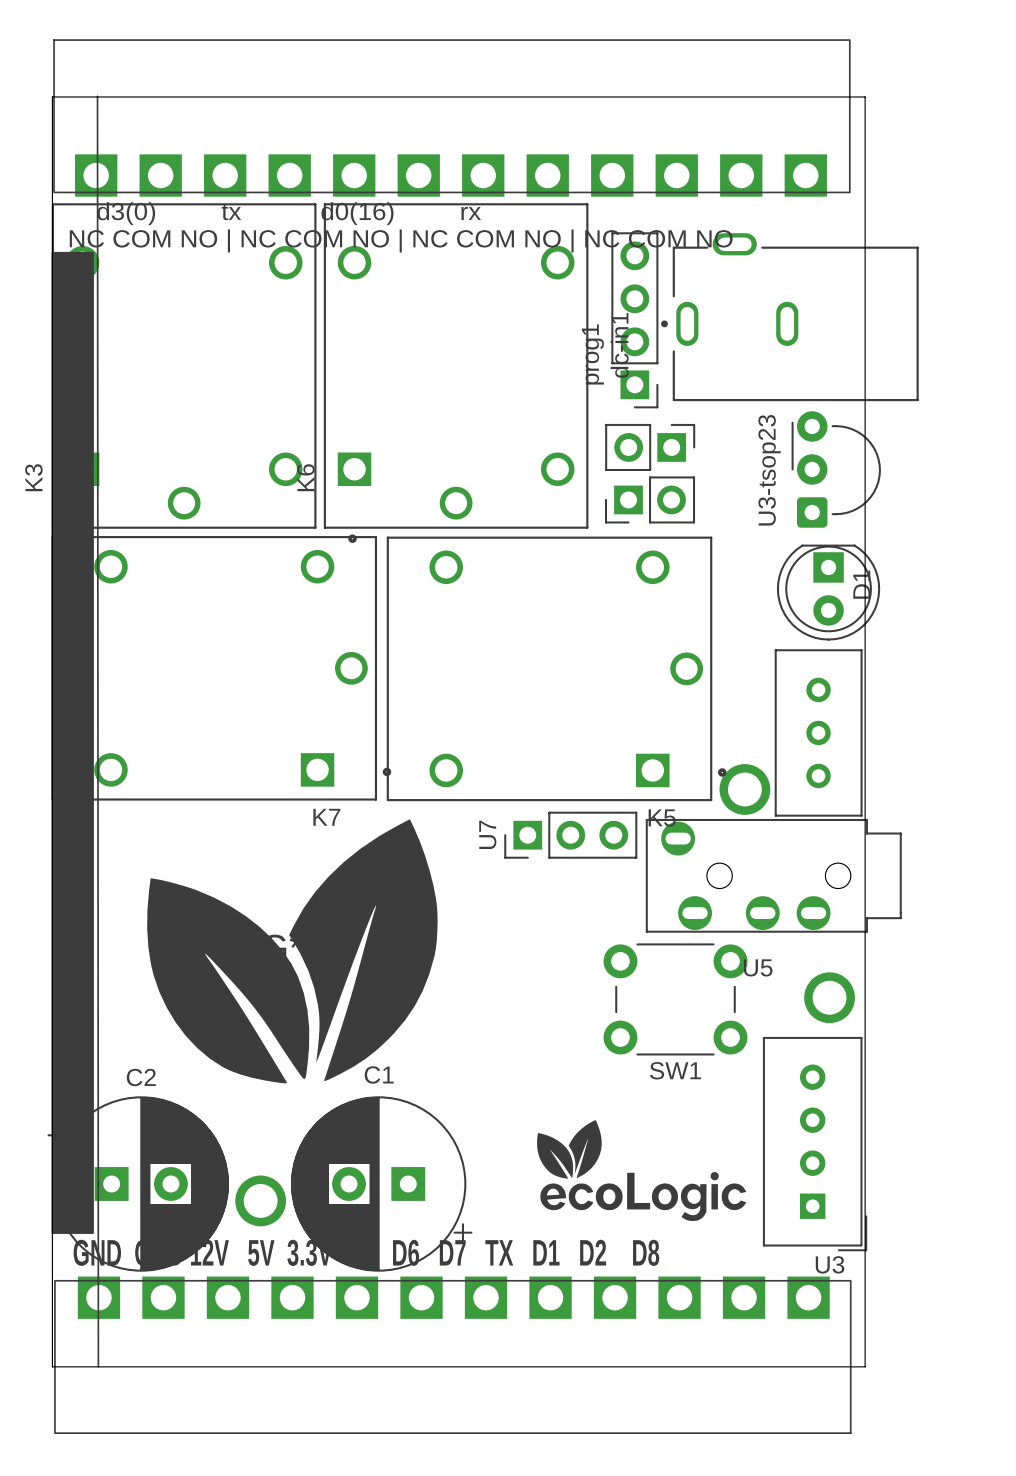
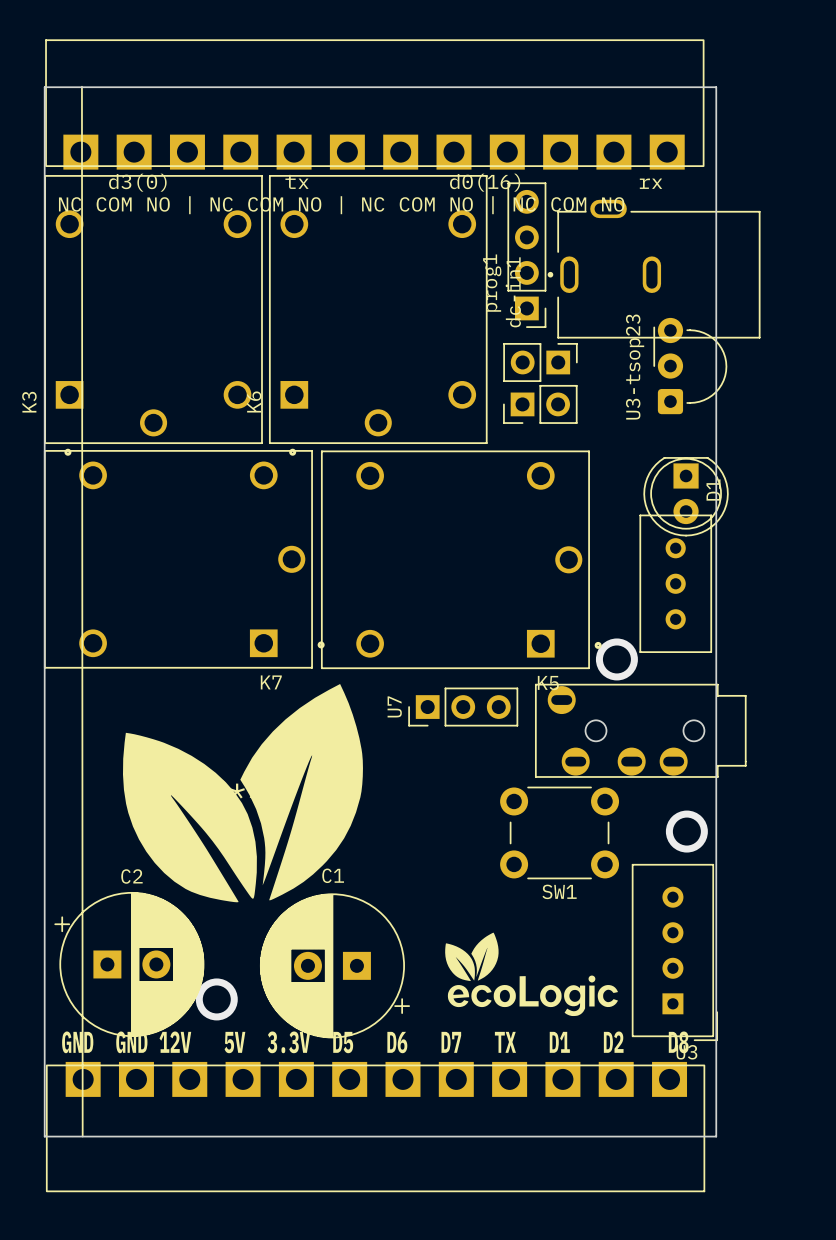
drawing: [51, 251, 94, 1234] -> none
prog1 position: (634, 320) -> (526, 255)
part: none -> (540, 362)
part: (650, 447) -> none
U3-tsop23 position: (836, 469) -> (690, 366)
part: none -> (540, 404)
part: (650, 499) -> none
part position: (818, 732) -> (675, 583)
U7 position: (570, 835) -> (463, 707)
U5 name: U5 (758, 967) -> none
C2 position: (138, 1183) -> (129, 964)
C1 position: (381, 1183) -> (334, 965)

